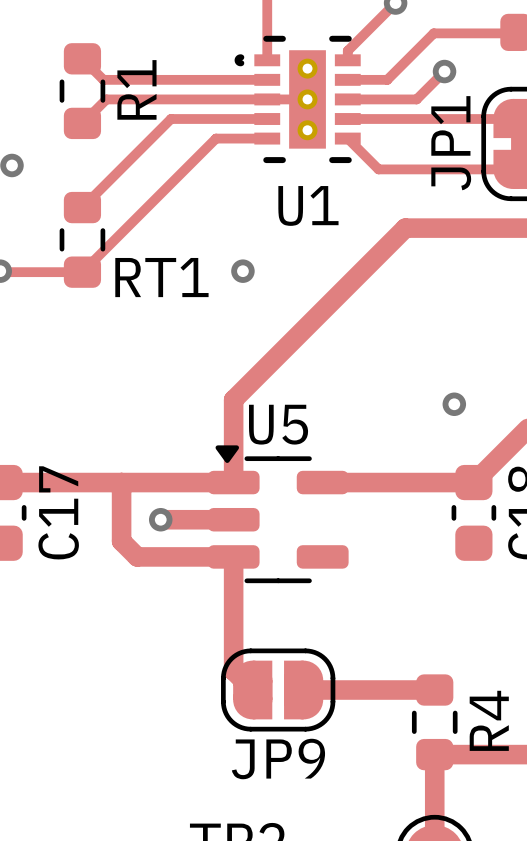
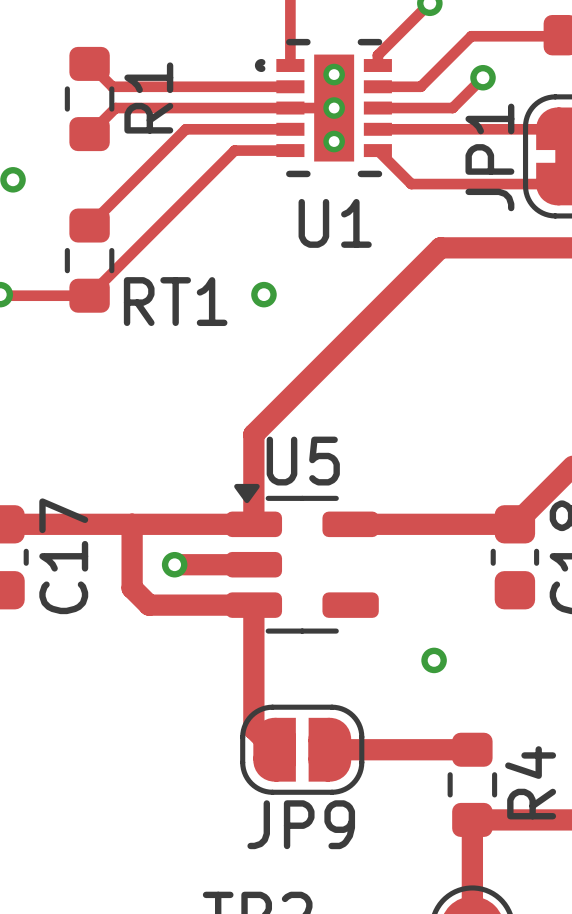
via position: (454, 404) -> (434, 660)

